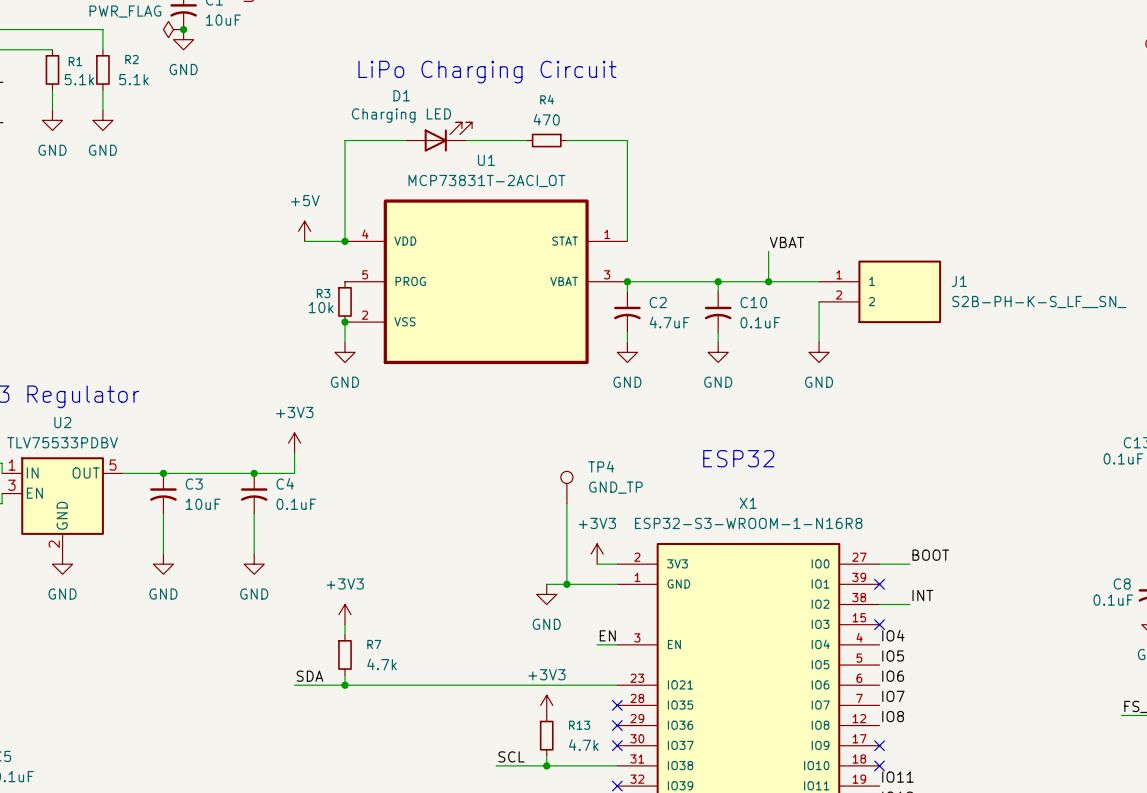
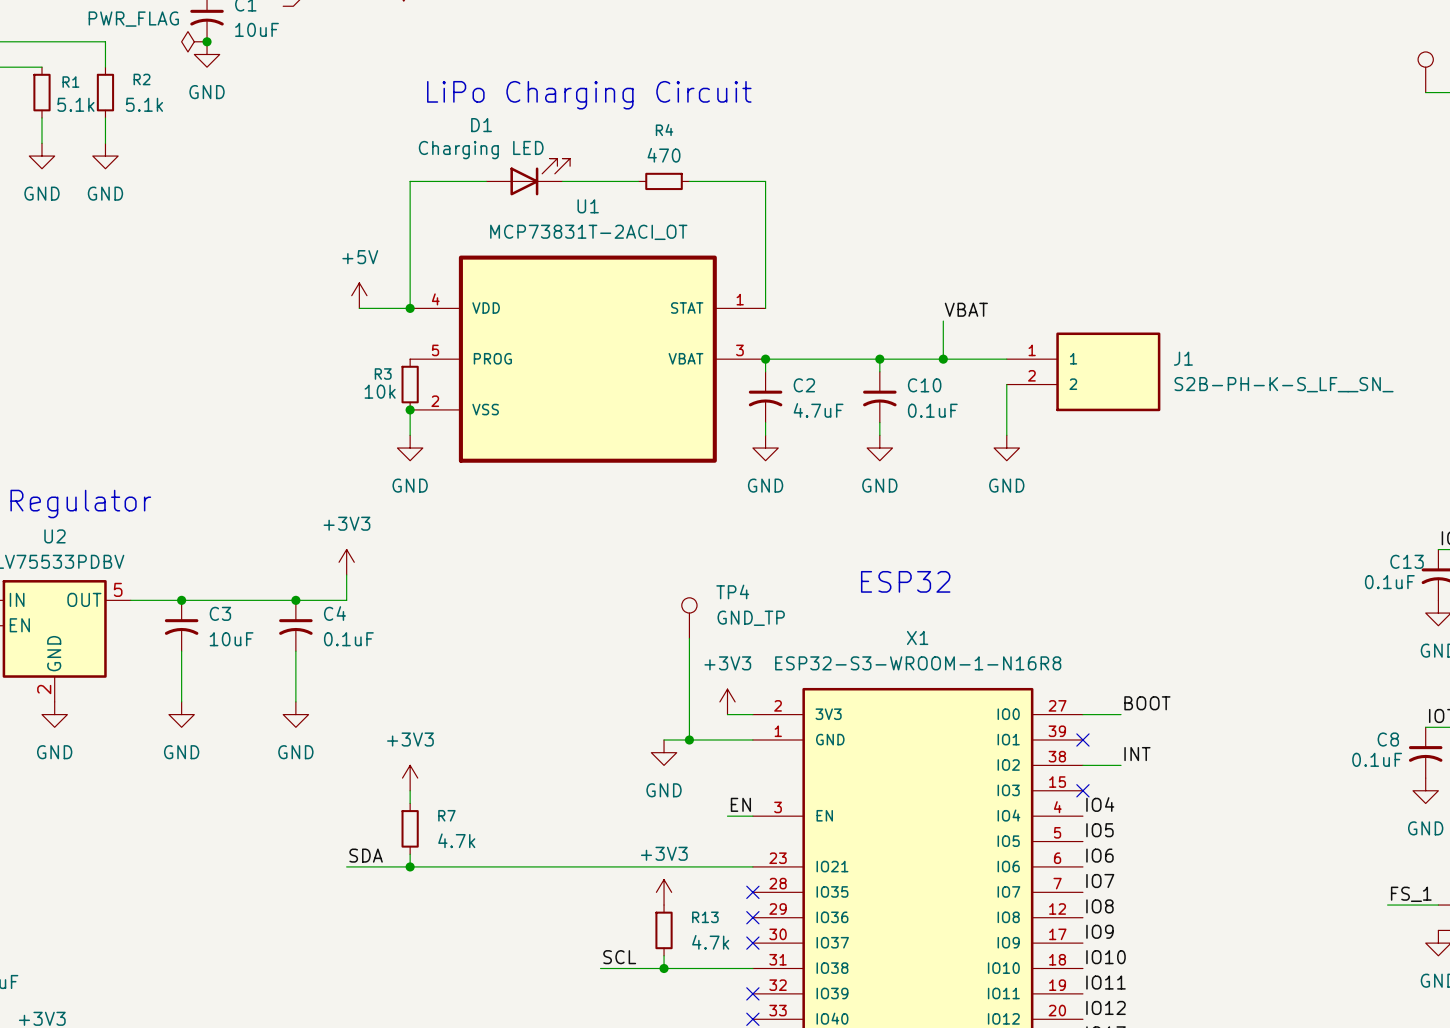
label: none -> IO9 (1099, 931)
no-connect mark: (879, 745) -> none
label: none -> IO10 (1106, 957)
no-connect mark: (879, 765) -> none

